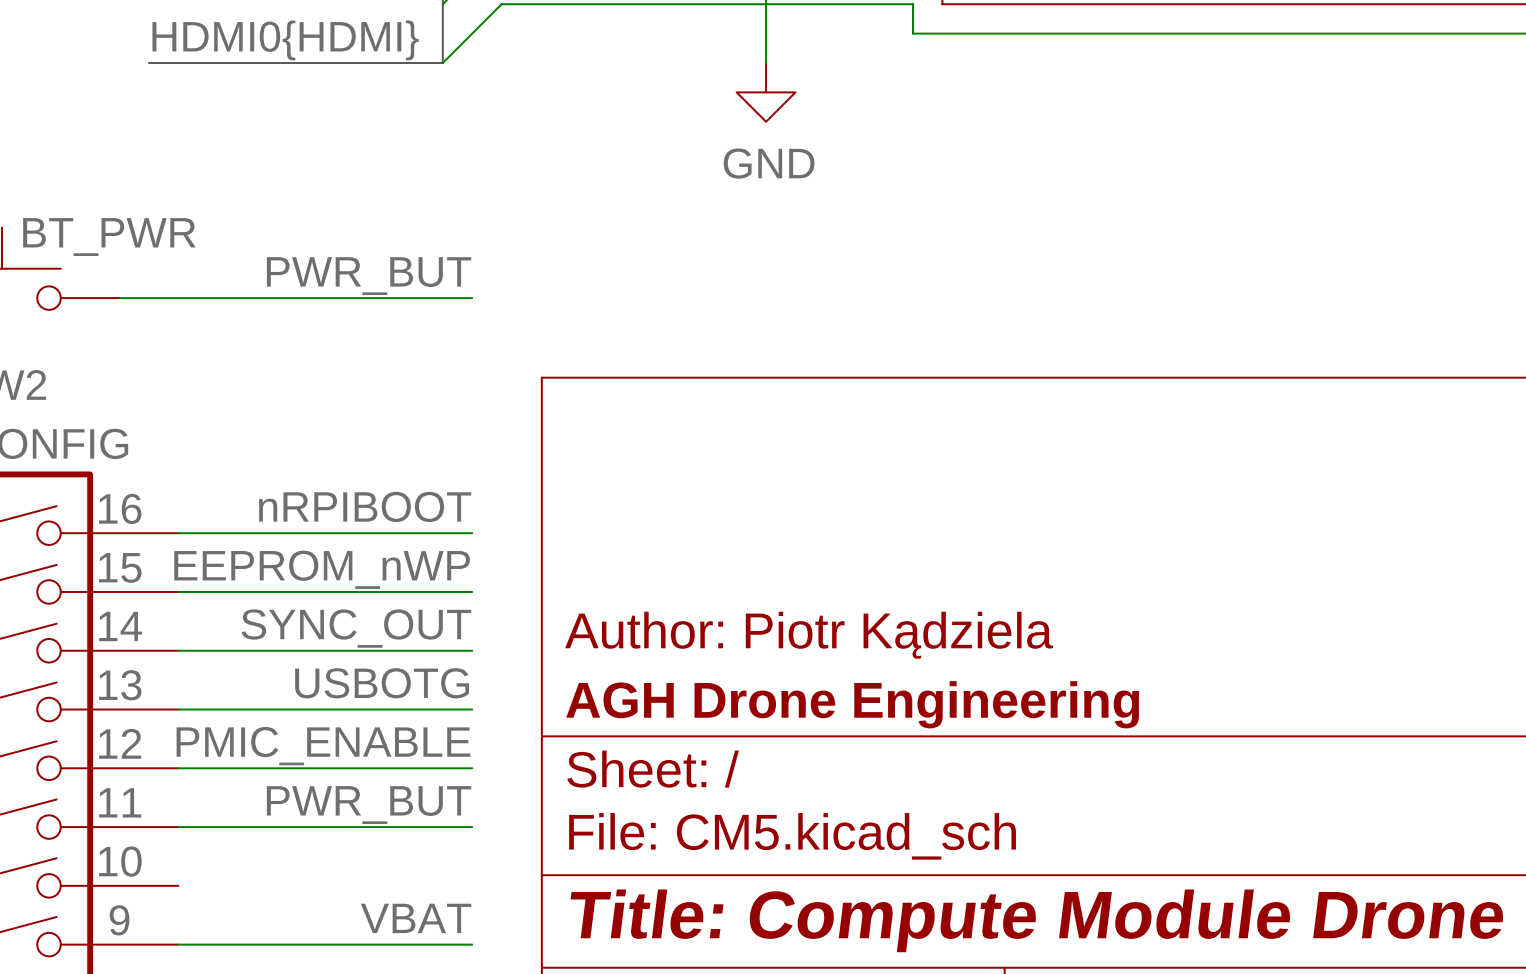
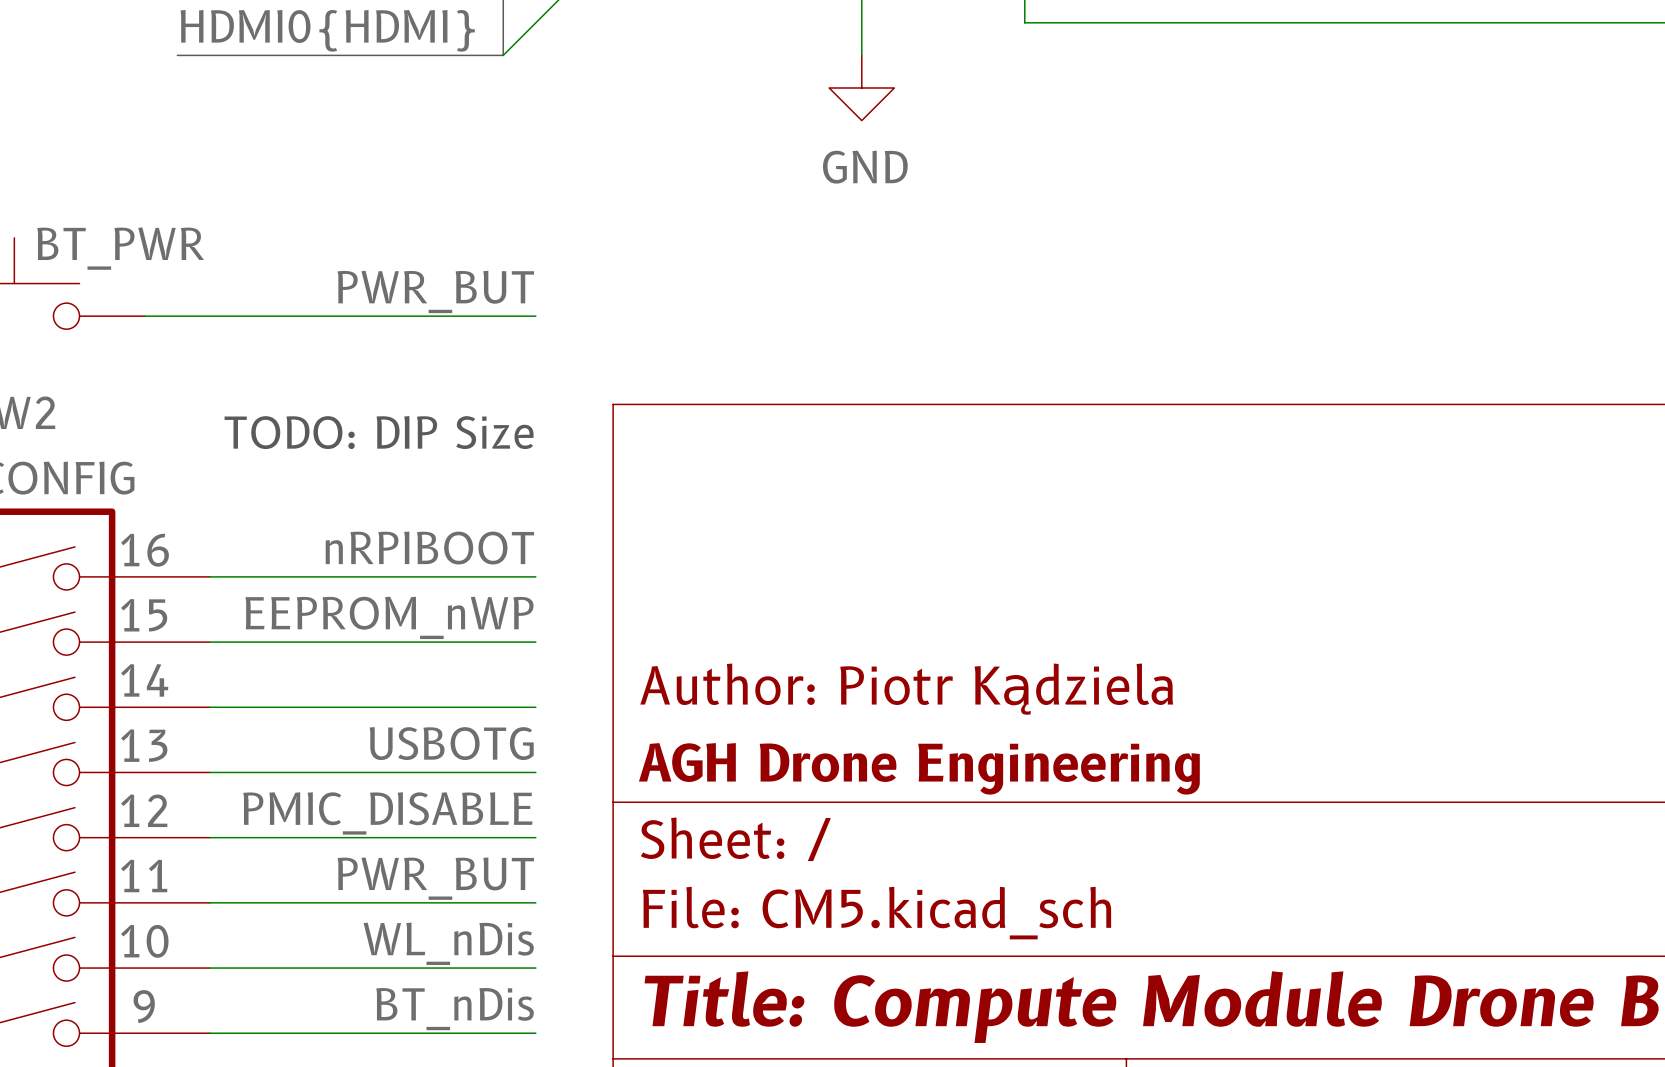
text: none -> TODO: DIP Size (379, 432)
label: SYNC_OUT (356, 628) -> none
label: PMIC_ENABLE (323, 746) -> PMIC_DISABLE (387, 813)
label: none -> WL_nDis (448, 943)
wire: none -> (209, 968) (535, 968)
label: VBAT (416, 918) -> BT_nDis (455, 1009)

